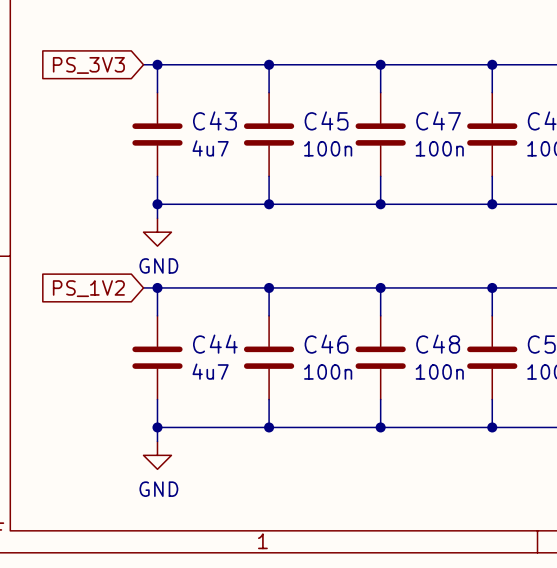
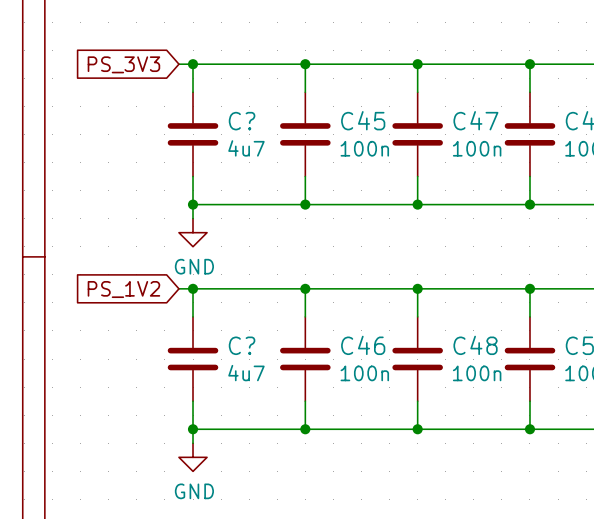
C43 name: C43 (214, 120) -> C? (242, 121)
C44 name: C44 (215, 344) -> C? (242, 345)

